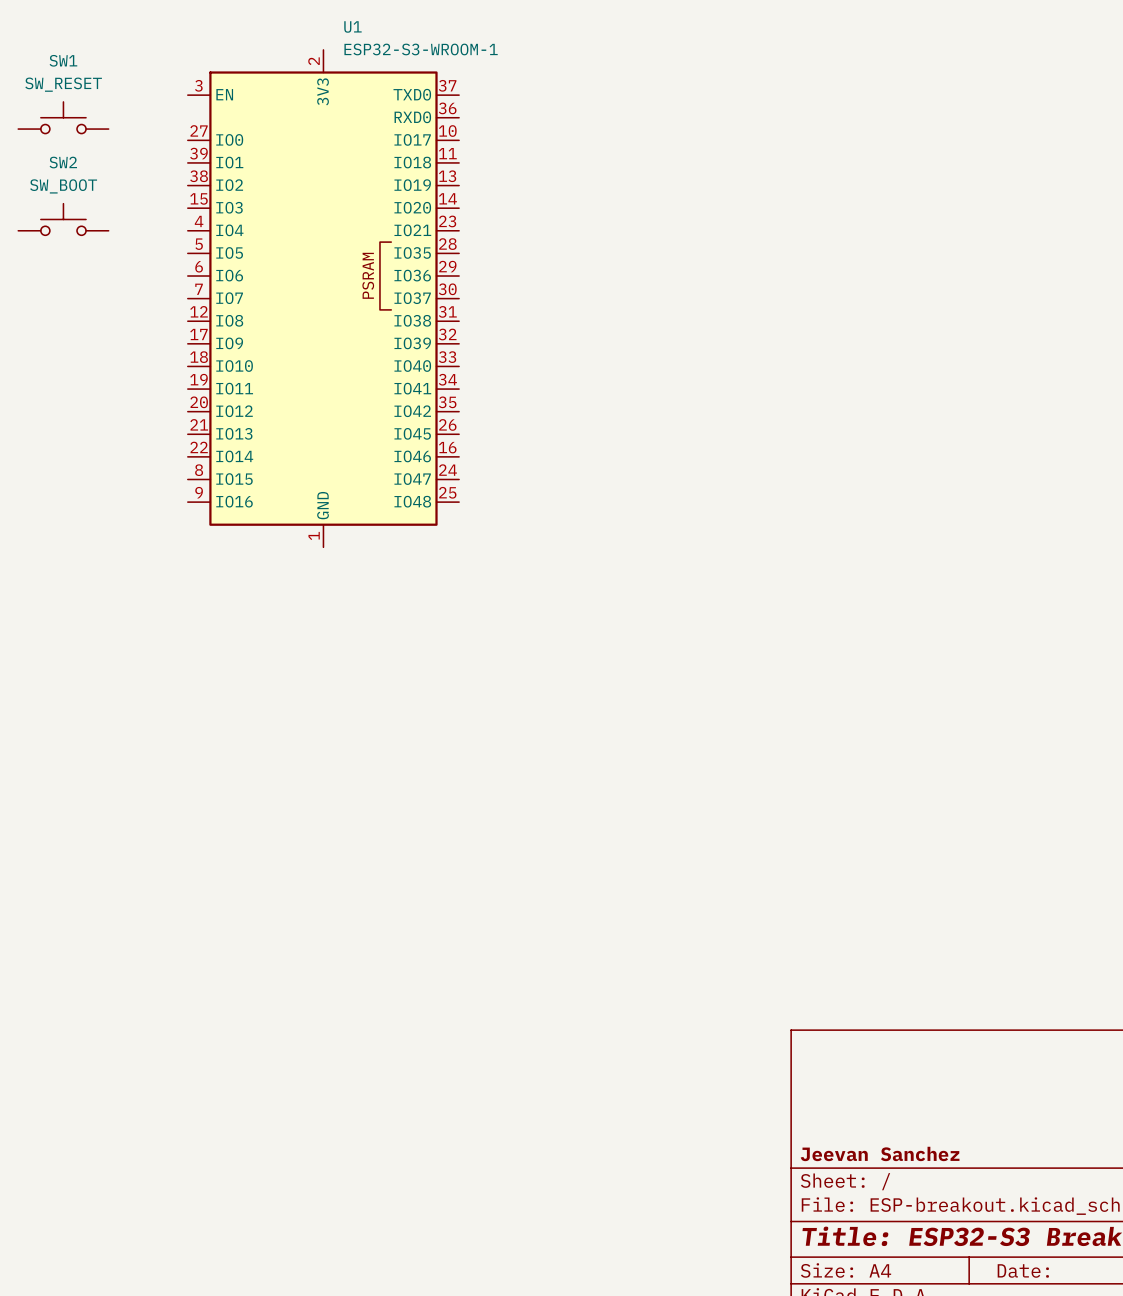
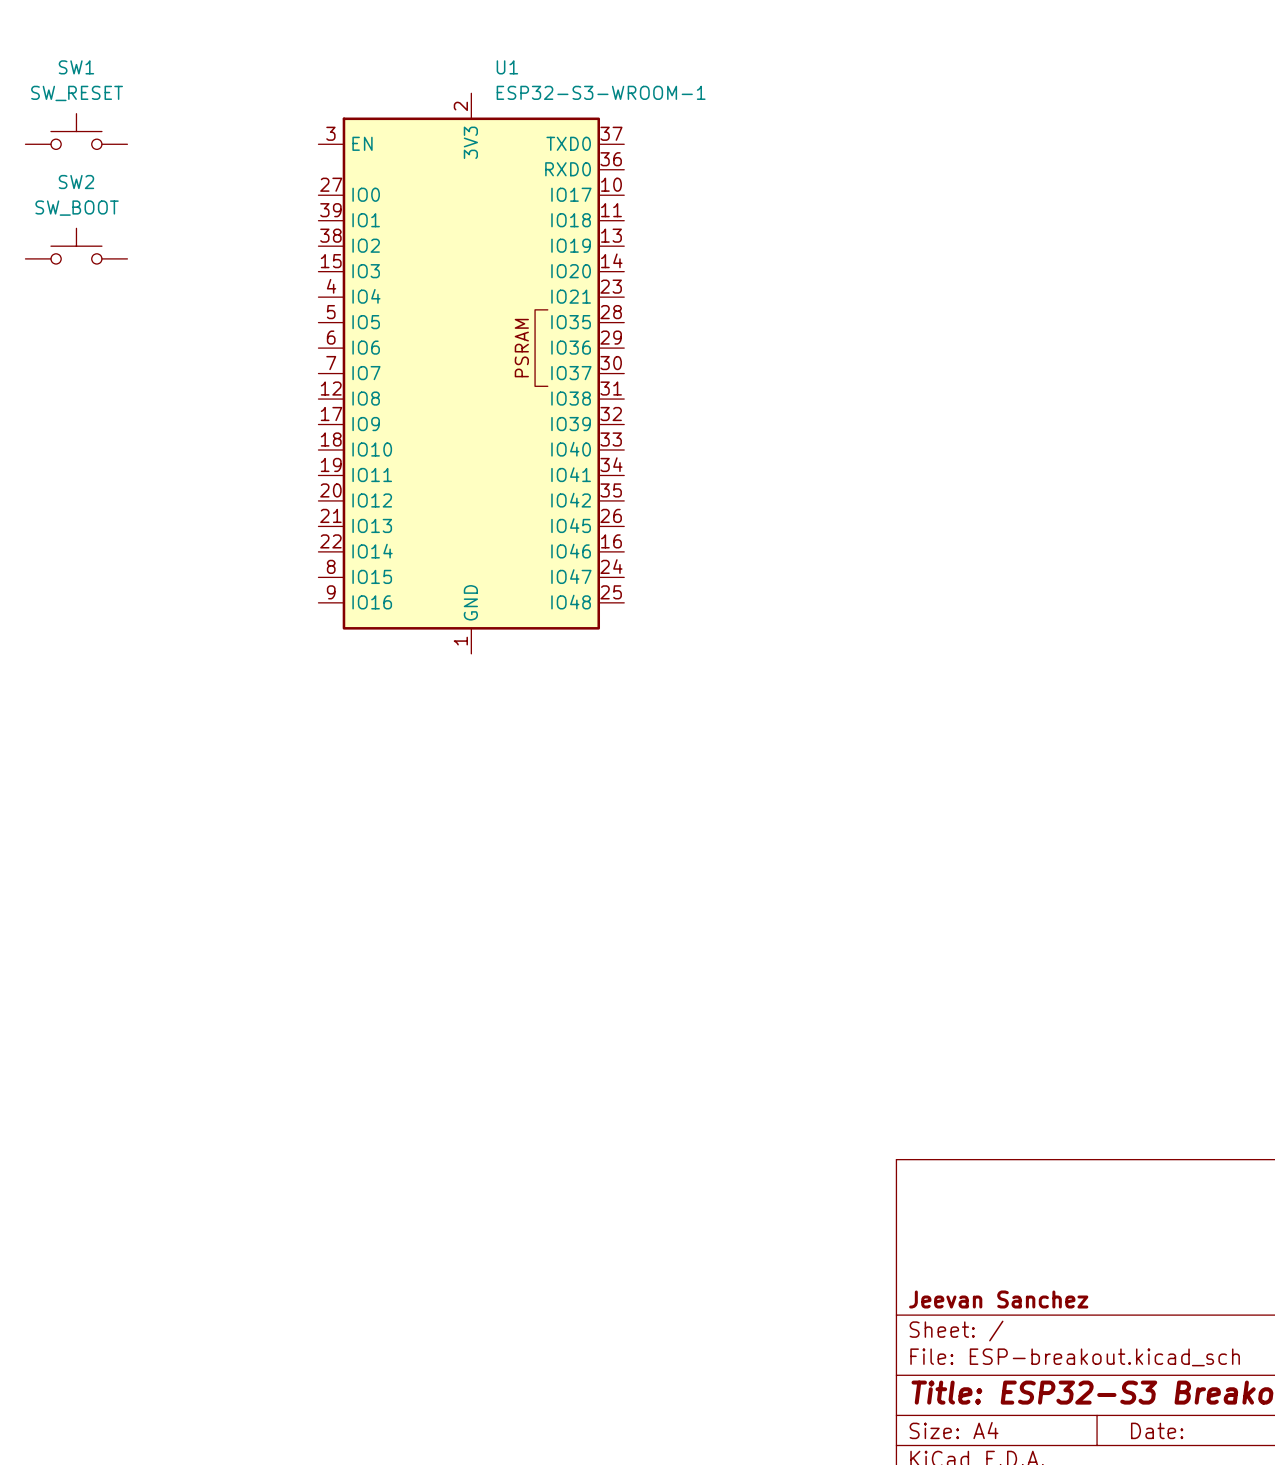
U1 position: (323, 298) -> (471, 373)

